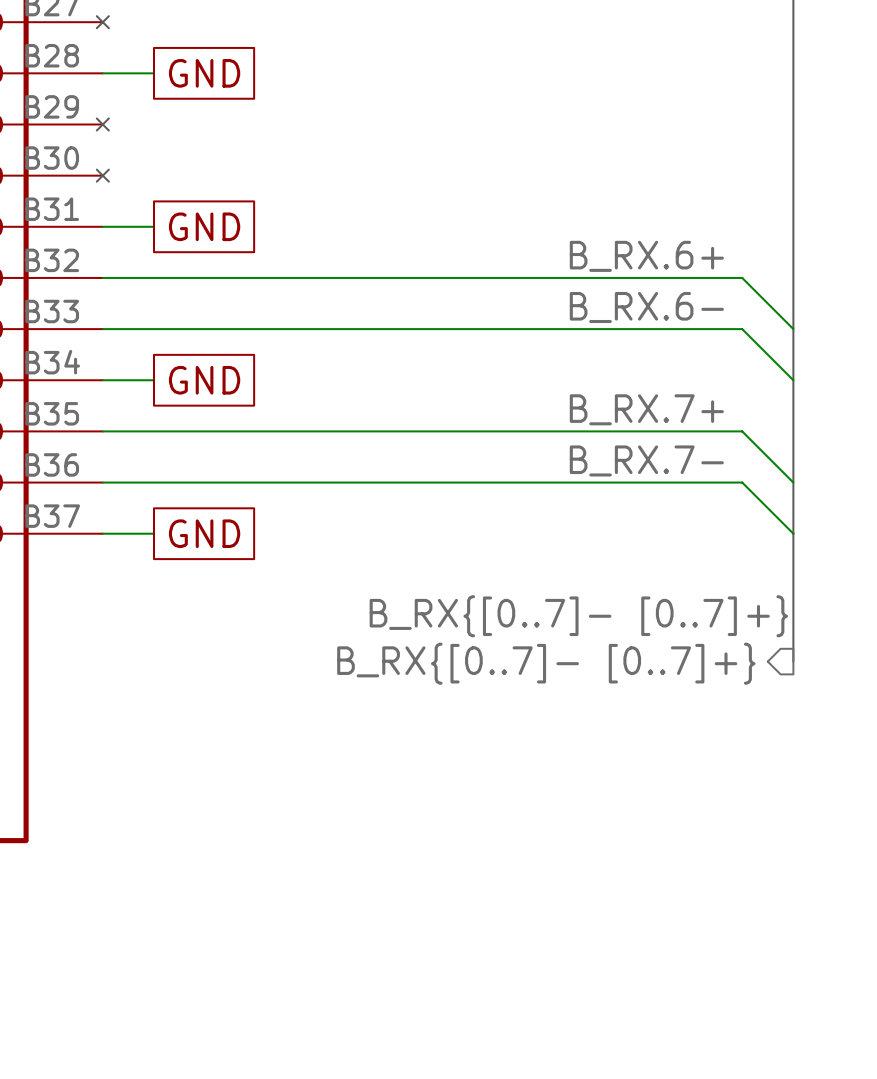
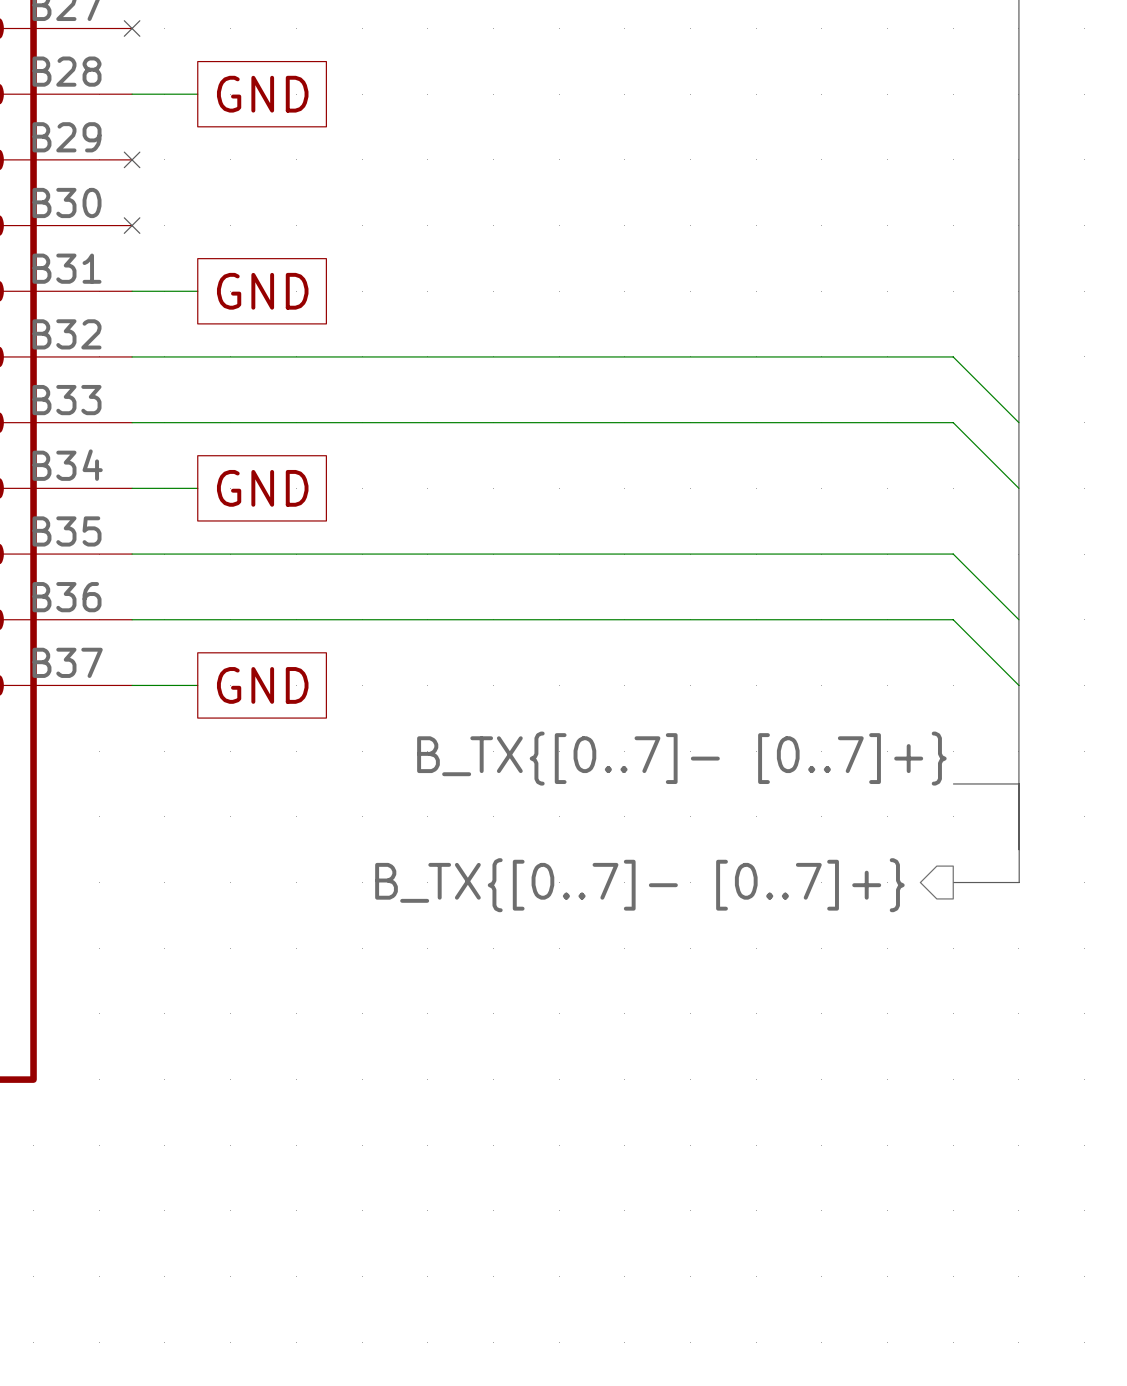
label: B_RX.6+ (646, 256) -> none
label: B_RX.6- (646, 307) -> none
label: B_RX.7+ (646, 409) -> none
label: B_RX.7- (646, 460) -> none
bus: none -> (953, 783) (1019, 783) (1019, 882) (953, 882)
label: B_RX{[0..7]- [0..7]+} (578, 616) -> B_TX{[0..7]- [0..7]+} (681, 758)
hierarchical label: B_RX{[0..7]- [0..7]+} (546, 663) -> B_TX{[0..7]- [0..7]+} (639, 885)

